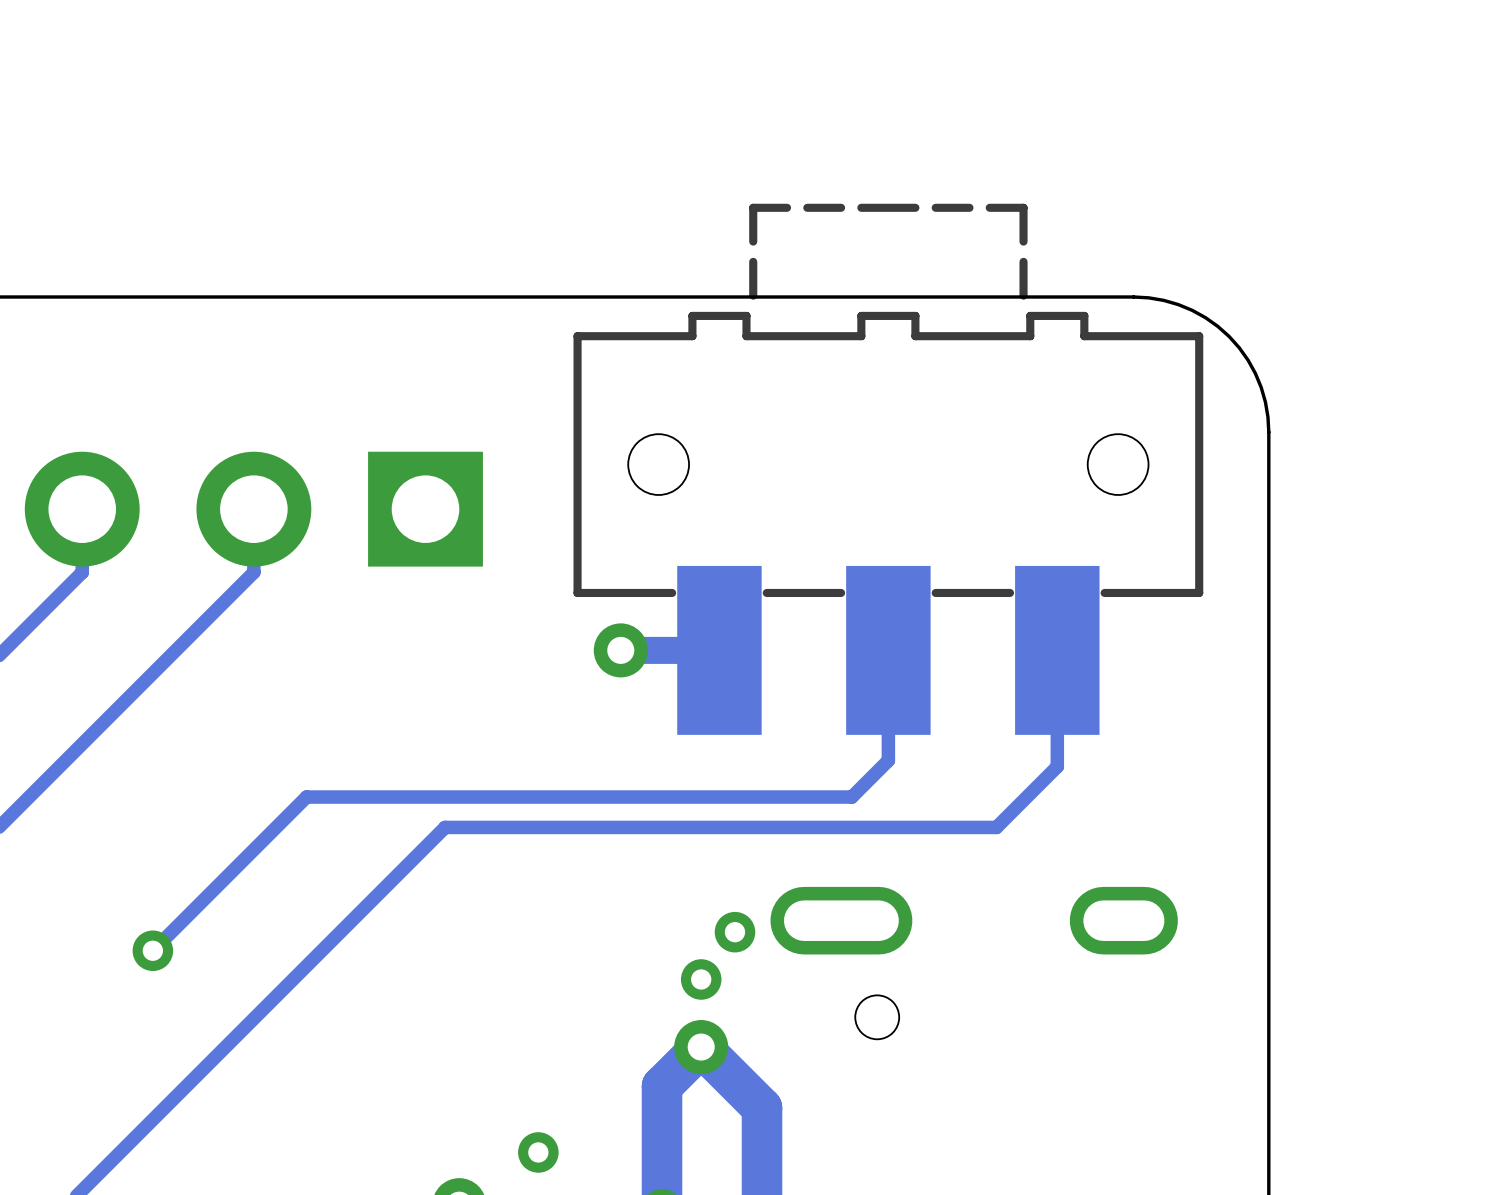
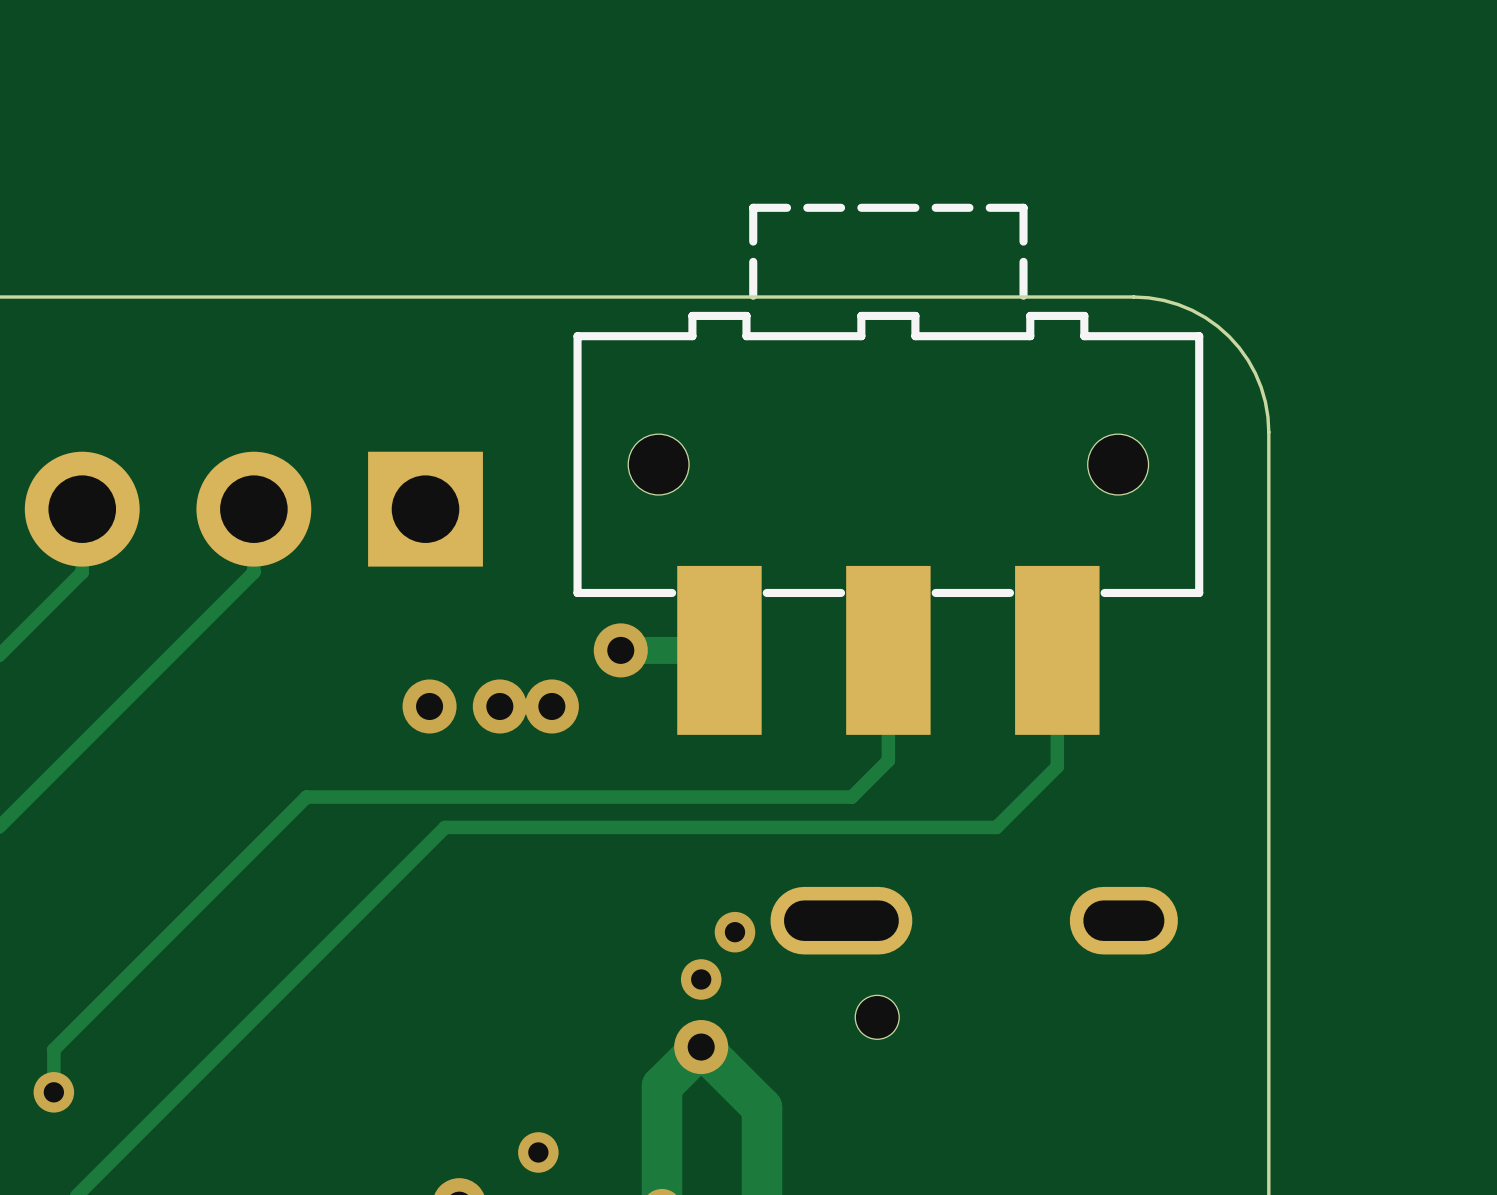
via: none -> (429, 706)
via: none -> (499, 706)
via: none -> (551, 706)
track: none -> (152, 950) (53, 1049) (53, 1092)
via position: (152, 950) -> (53, 1092)

